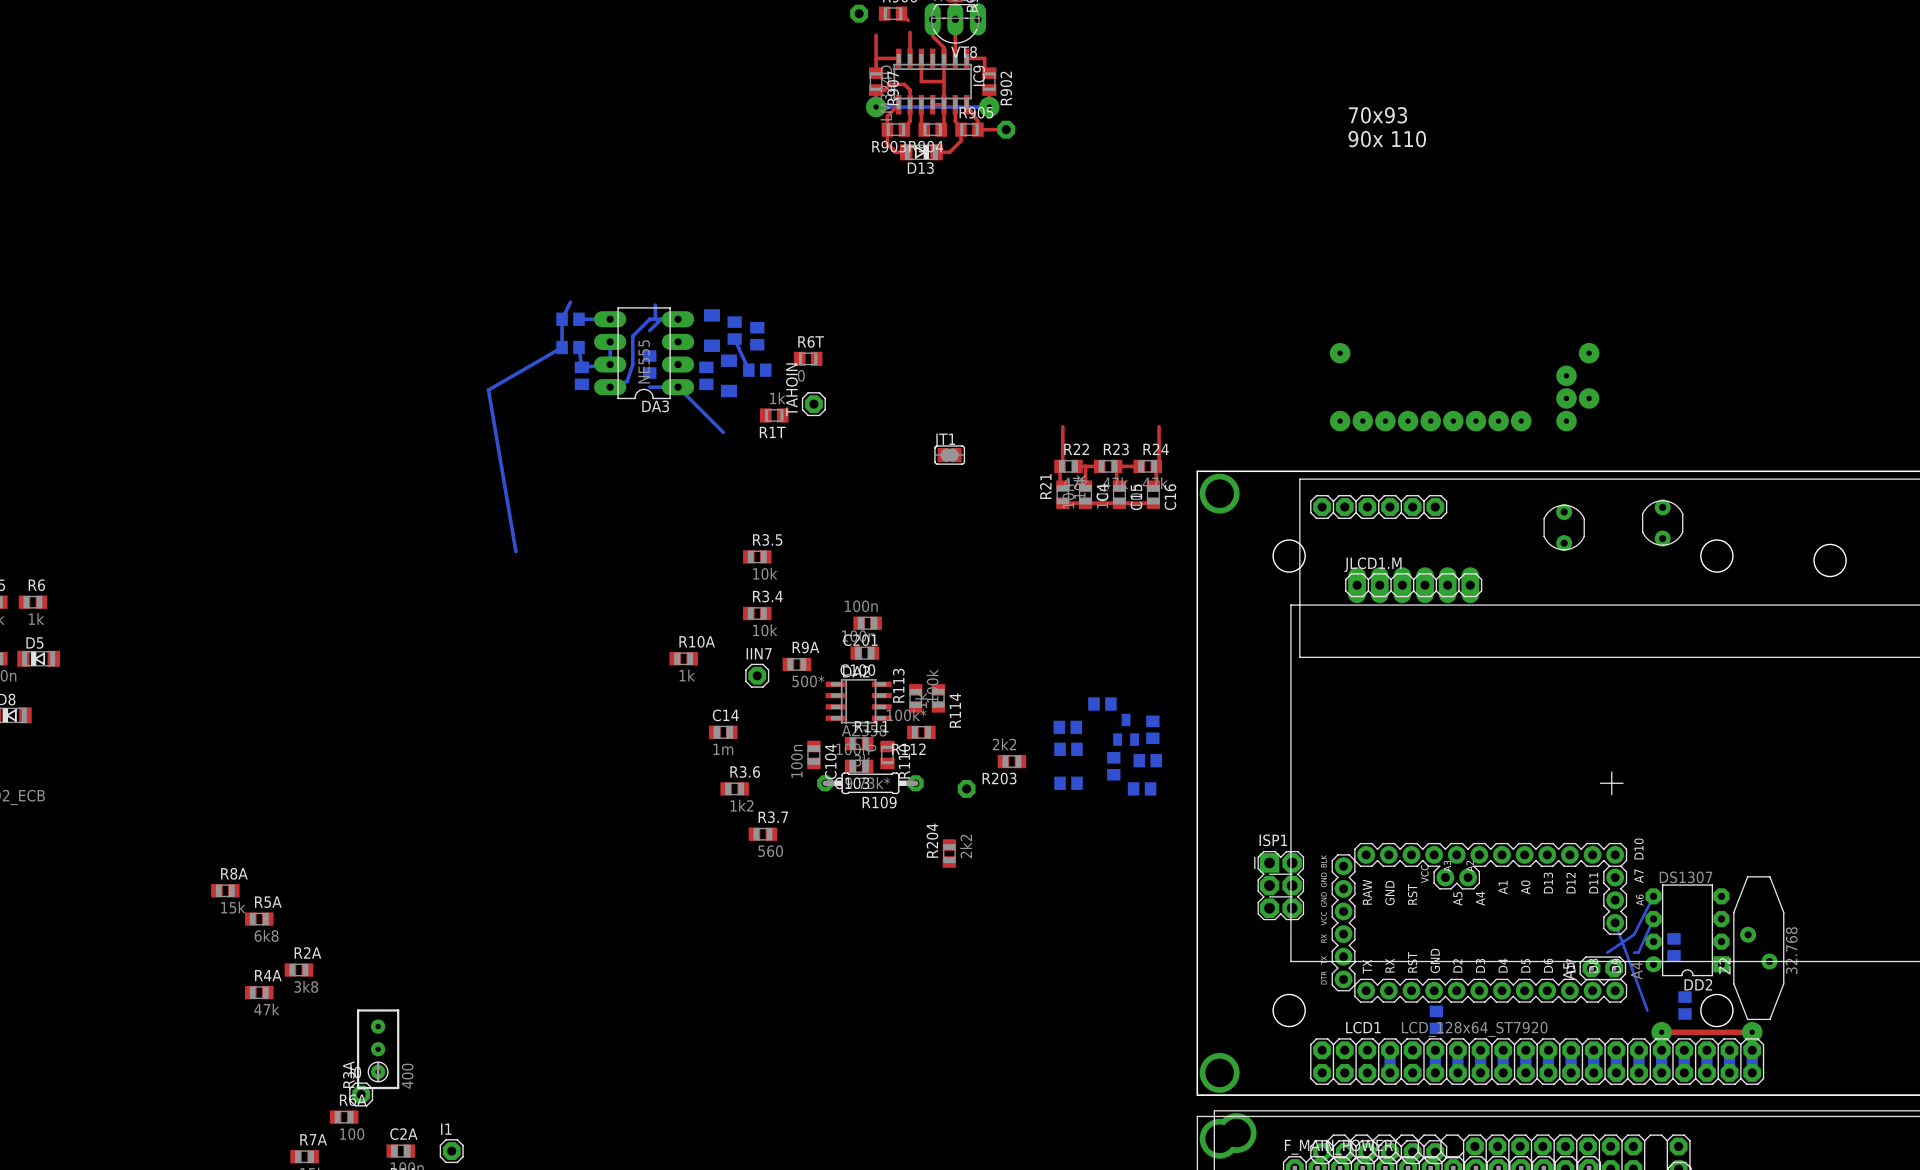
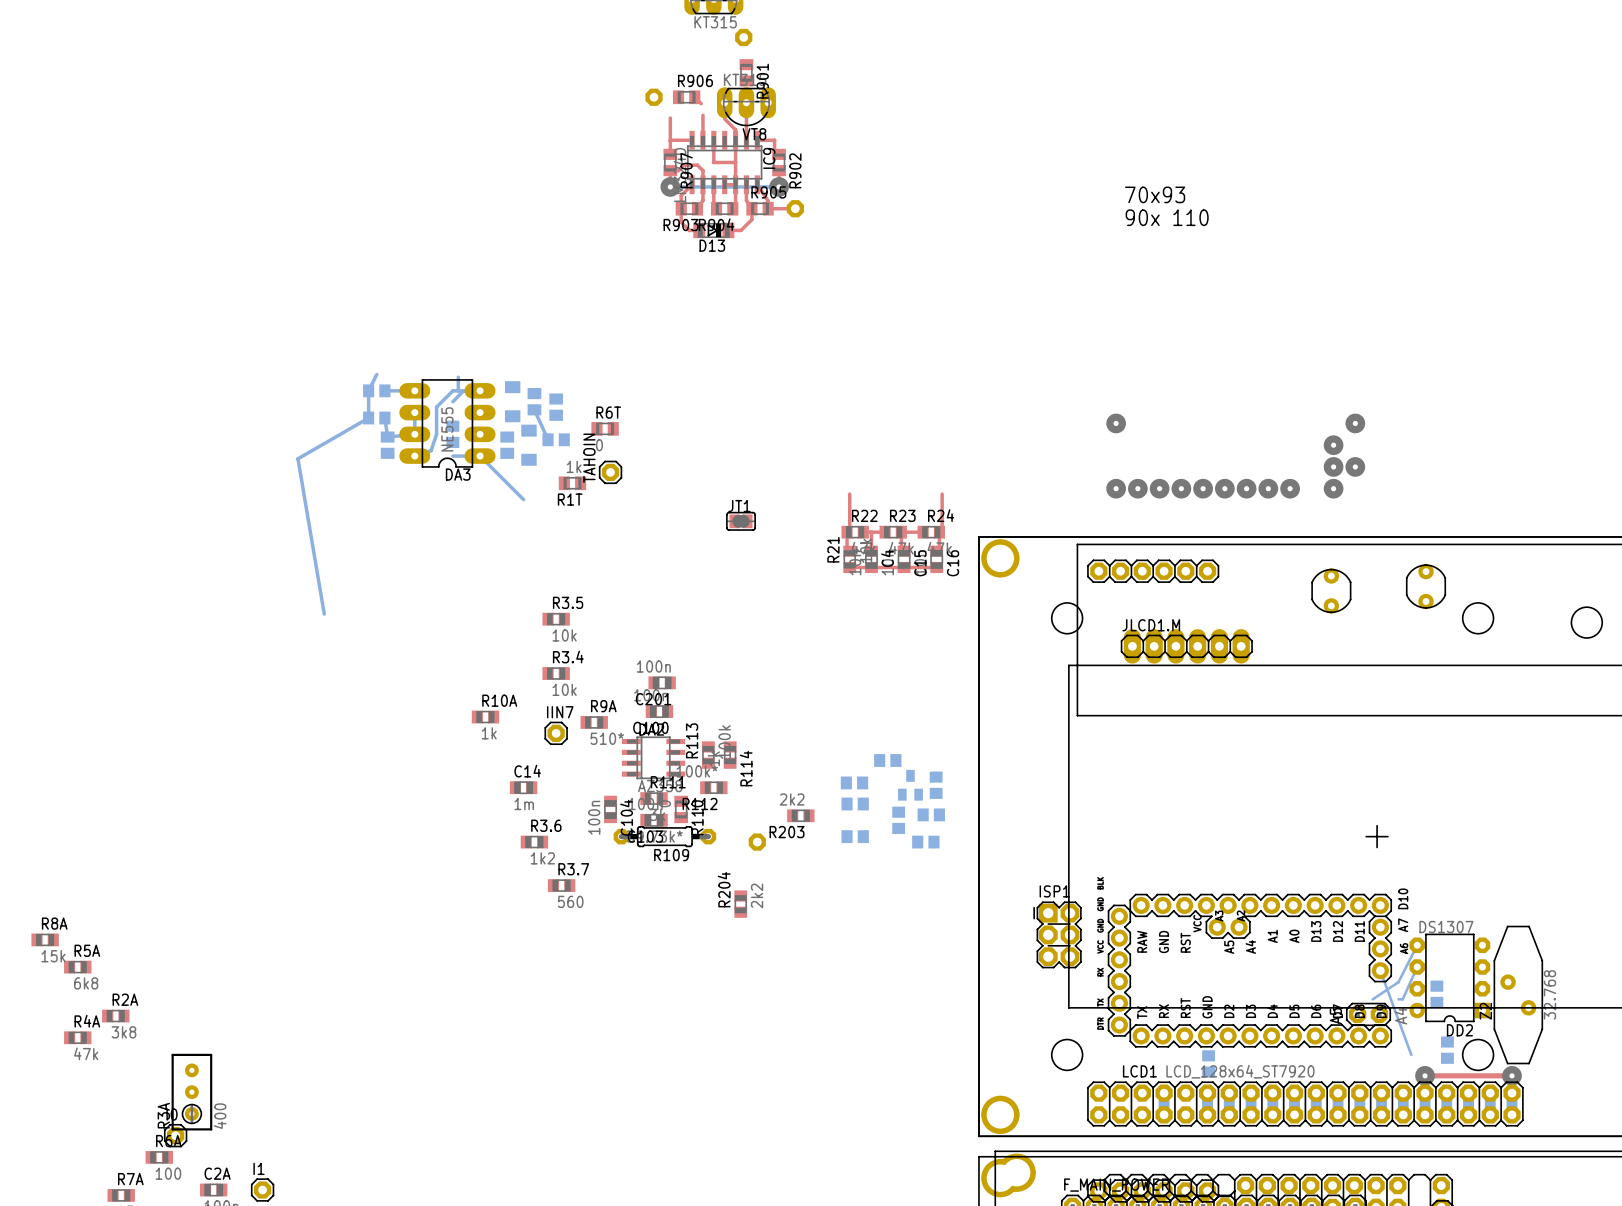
R9A value: 500* (808, 681) -> 510* (607, 738)

